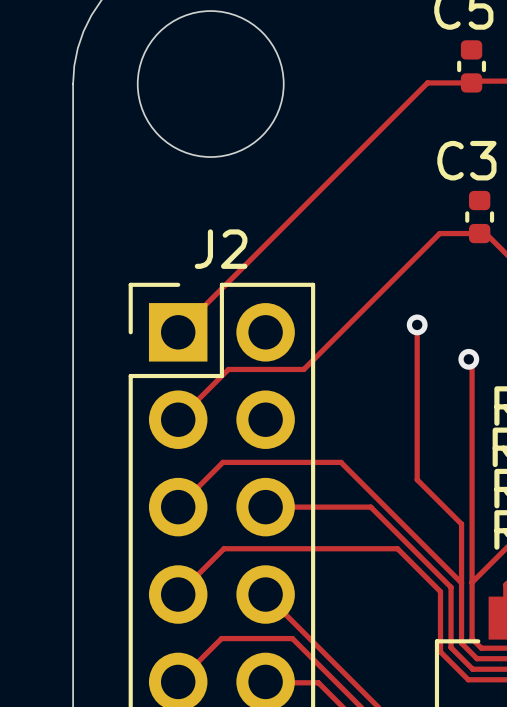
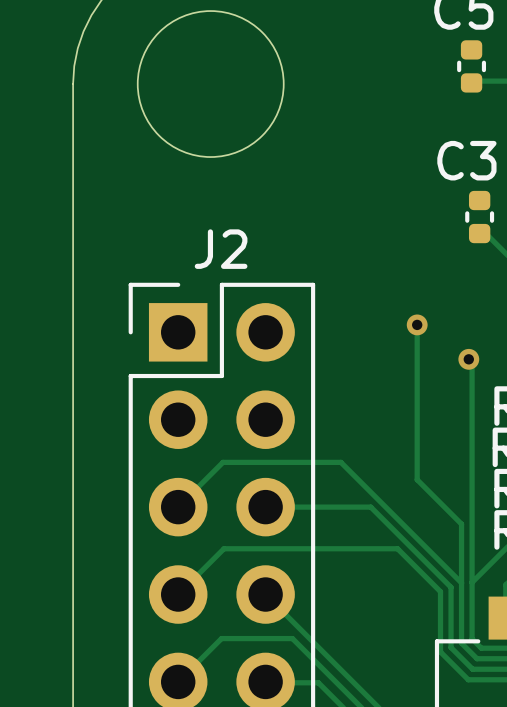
track: (471, 82) (427, 82) (178, 332) -> none
track: (479, 233) (439, 233) (303, 369) (228, 369) (178, 419) -> none

